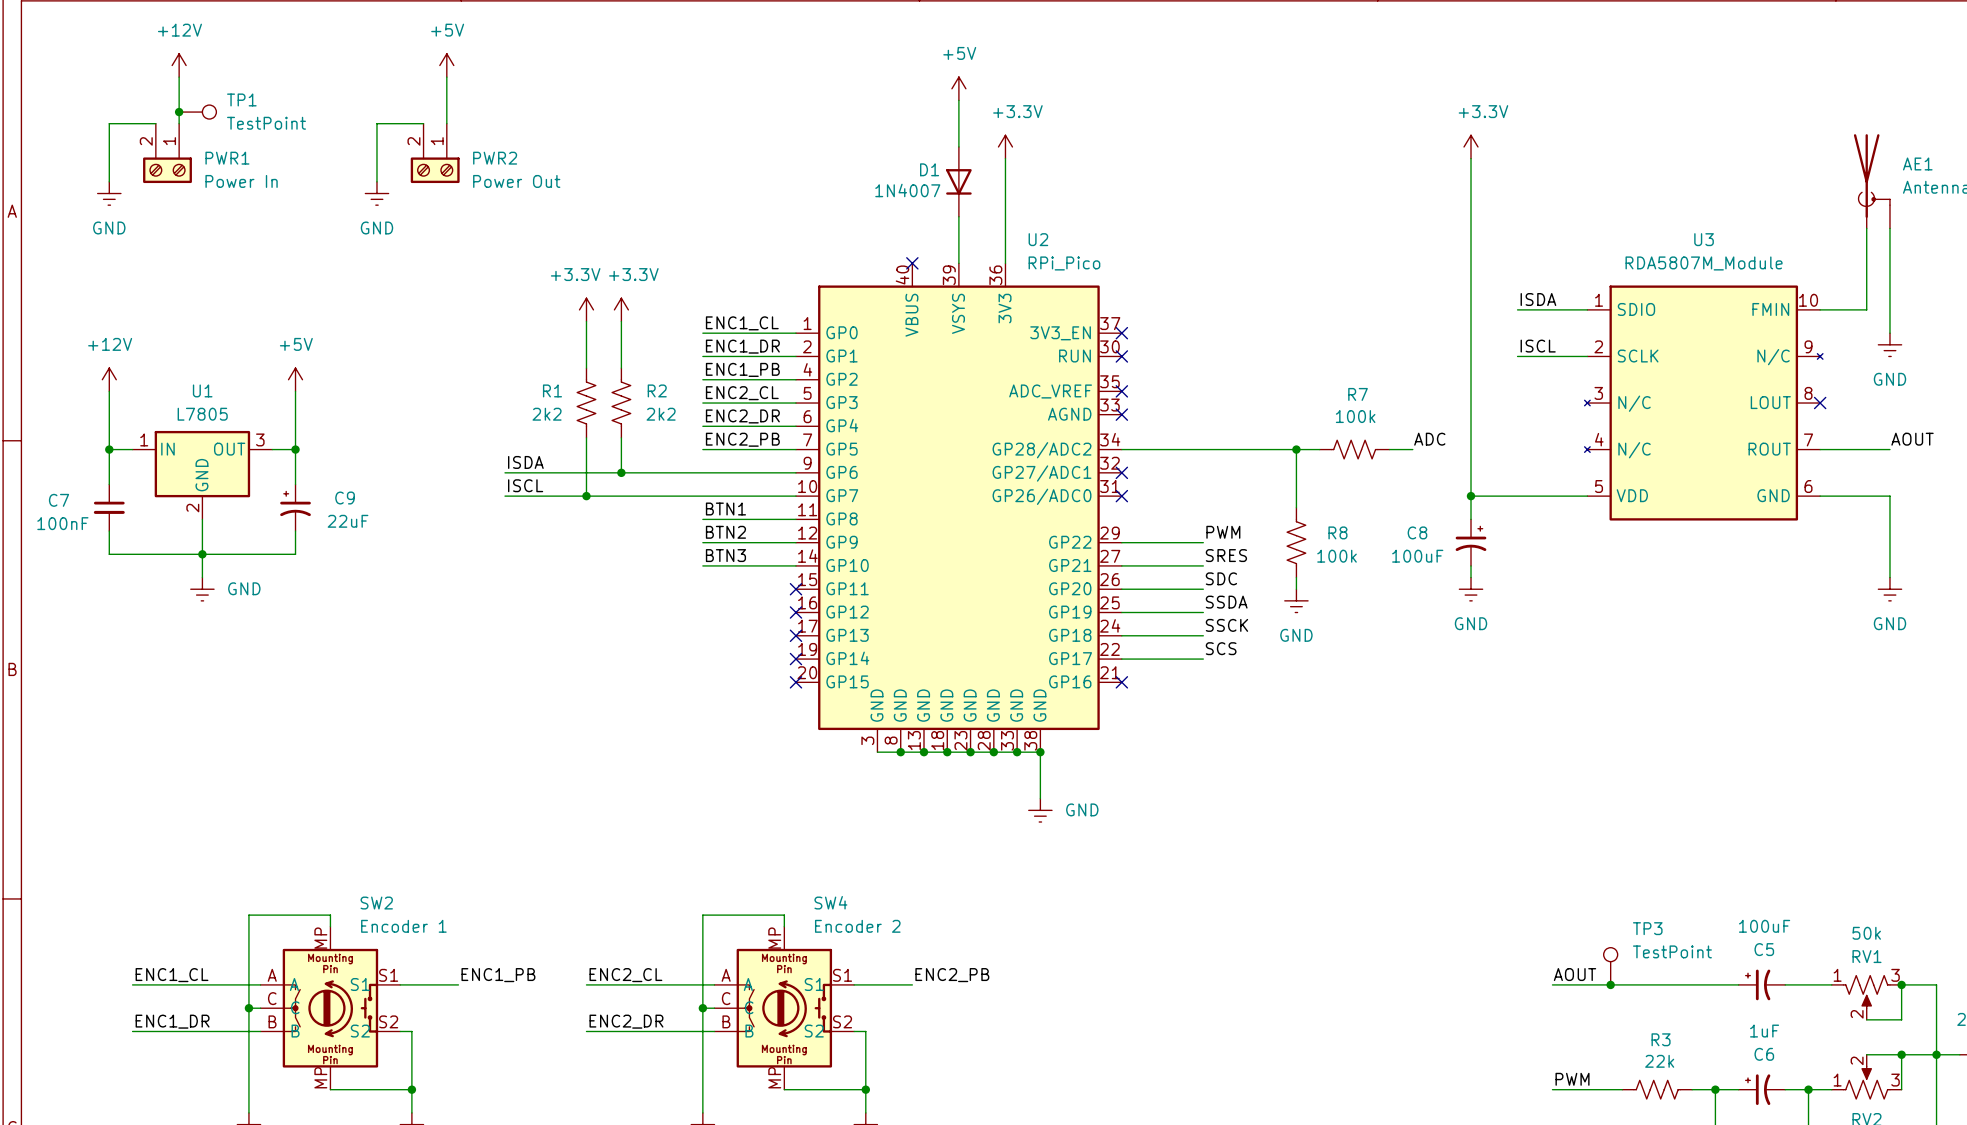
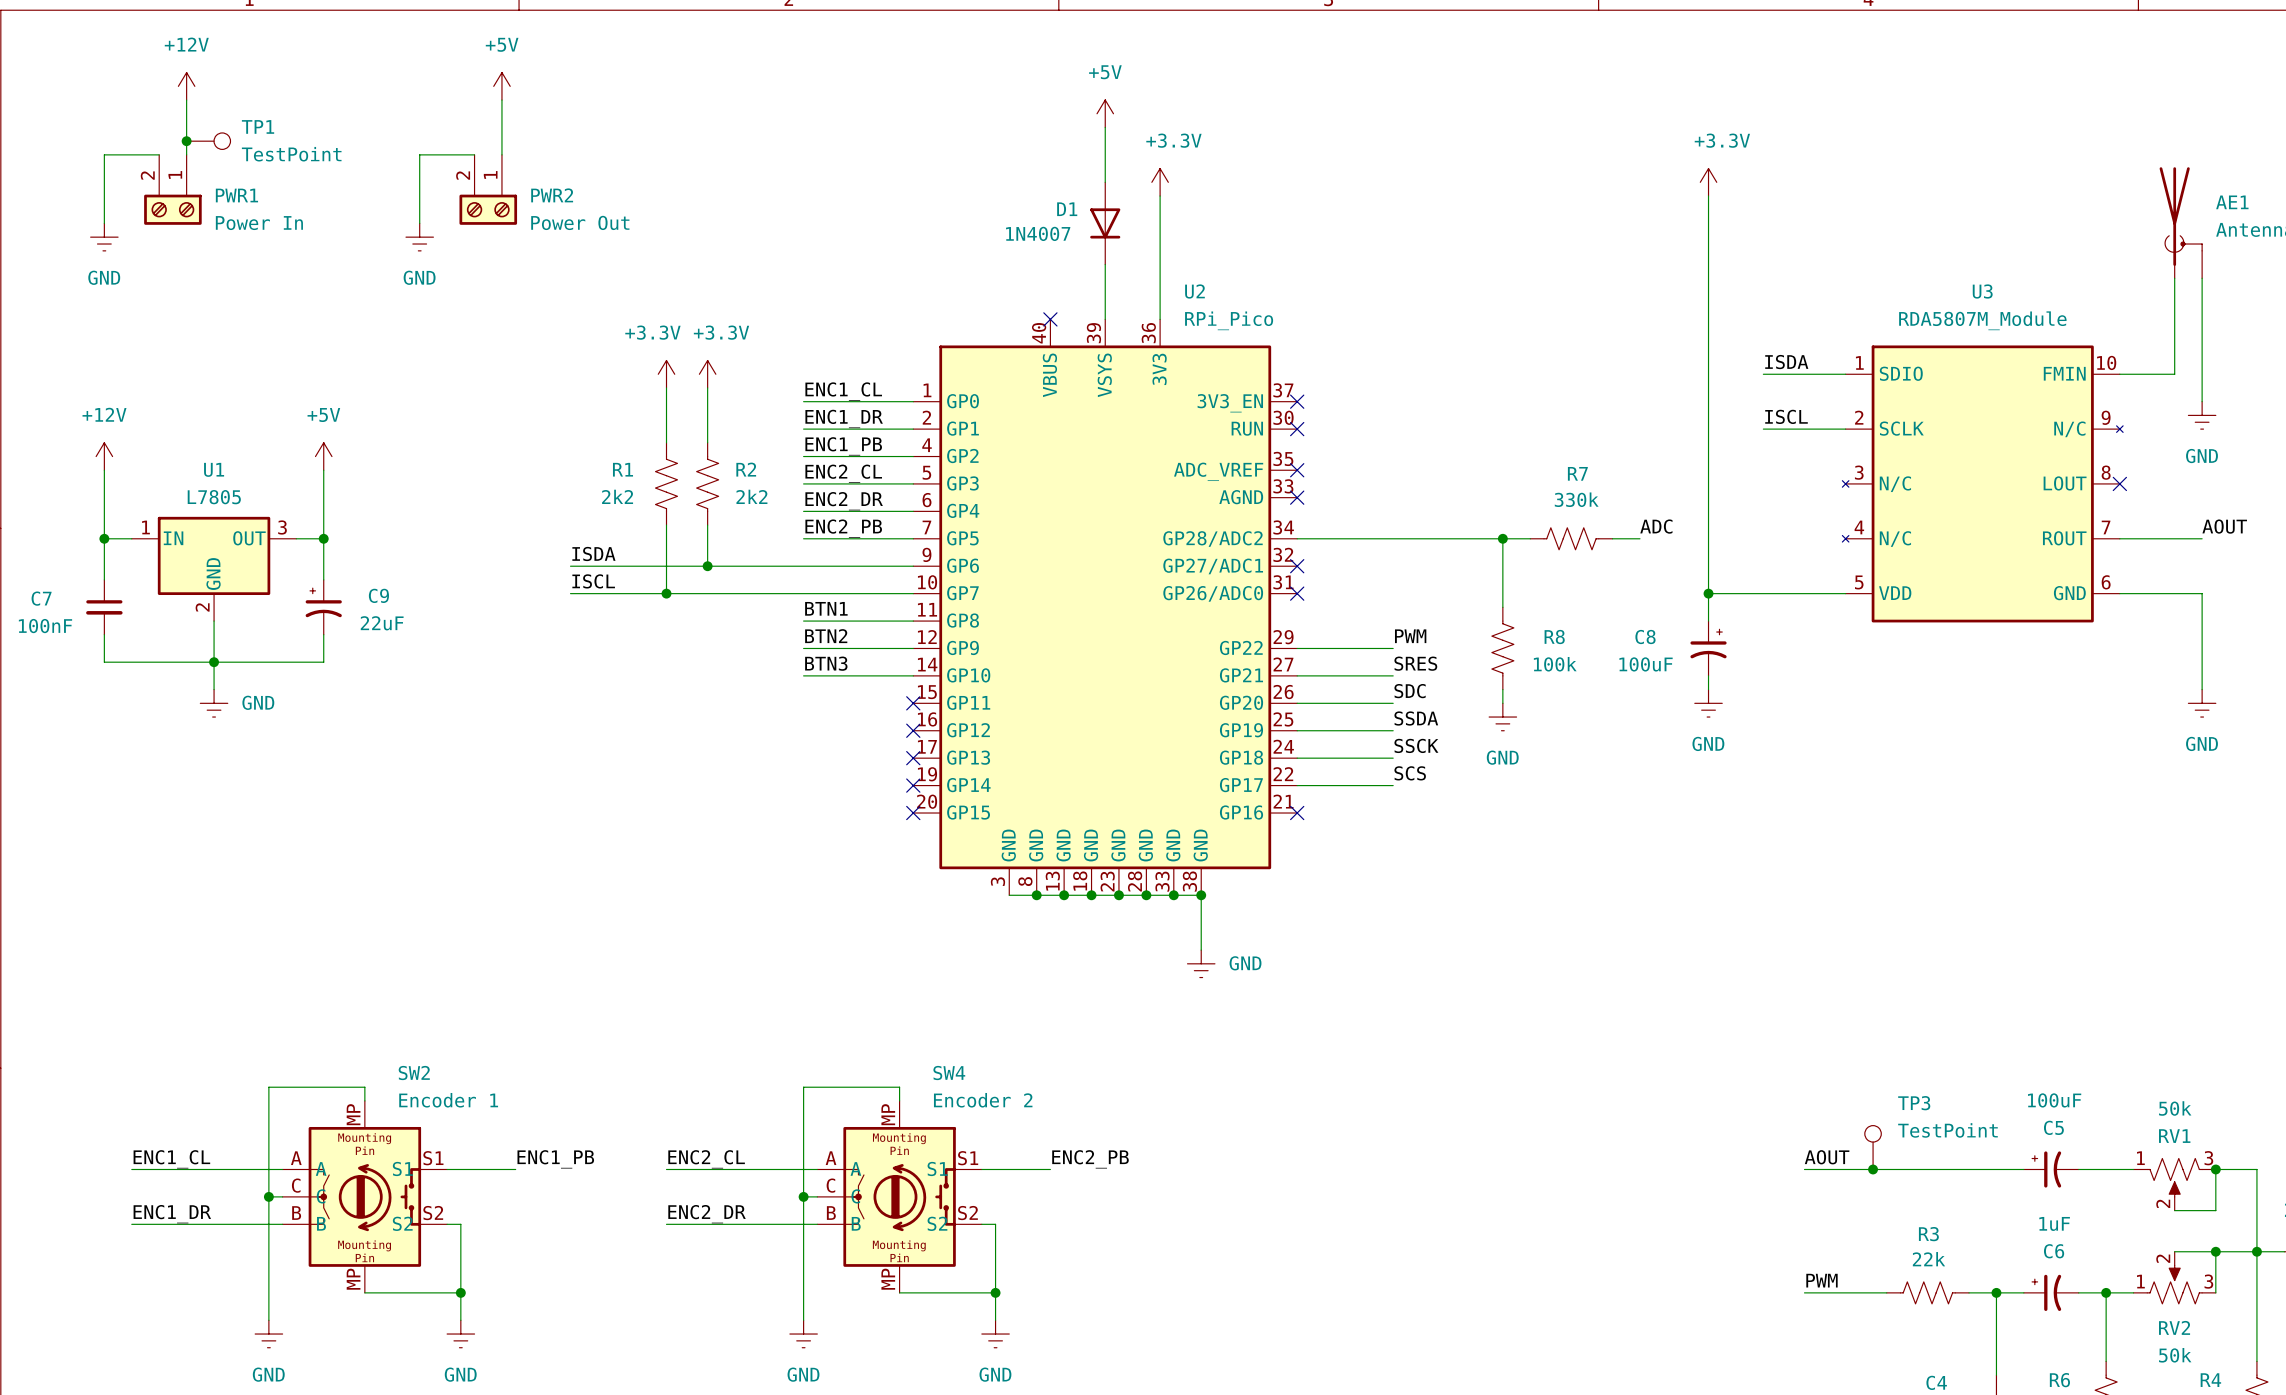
R7 value: 100k (1355, 416) -> 330k (1576, 499)

